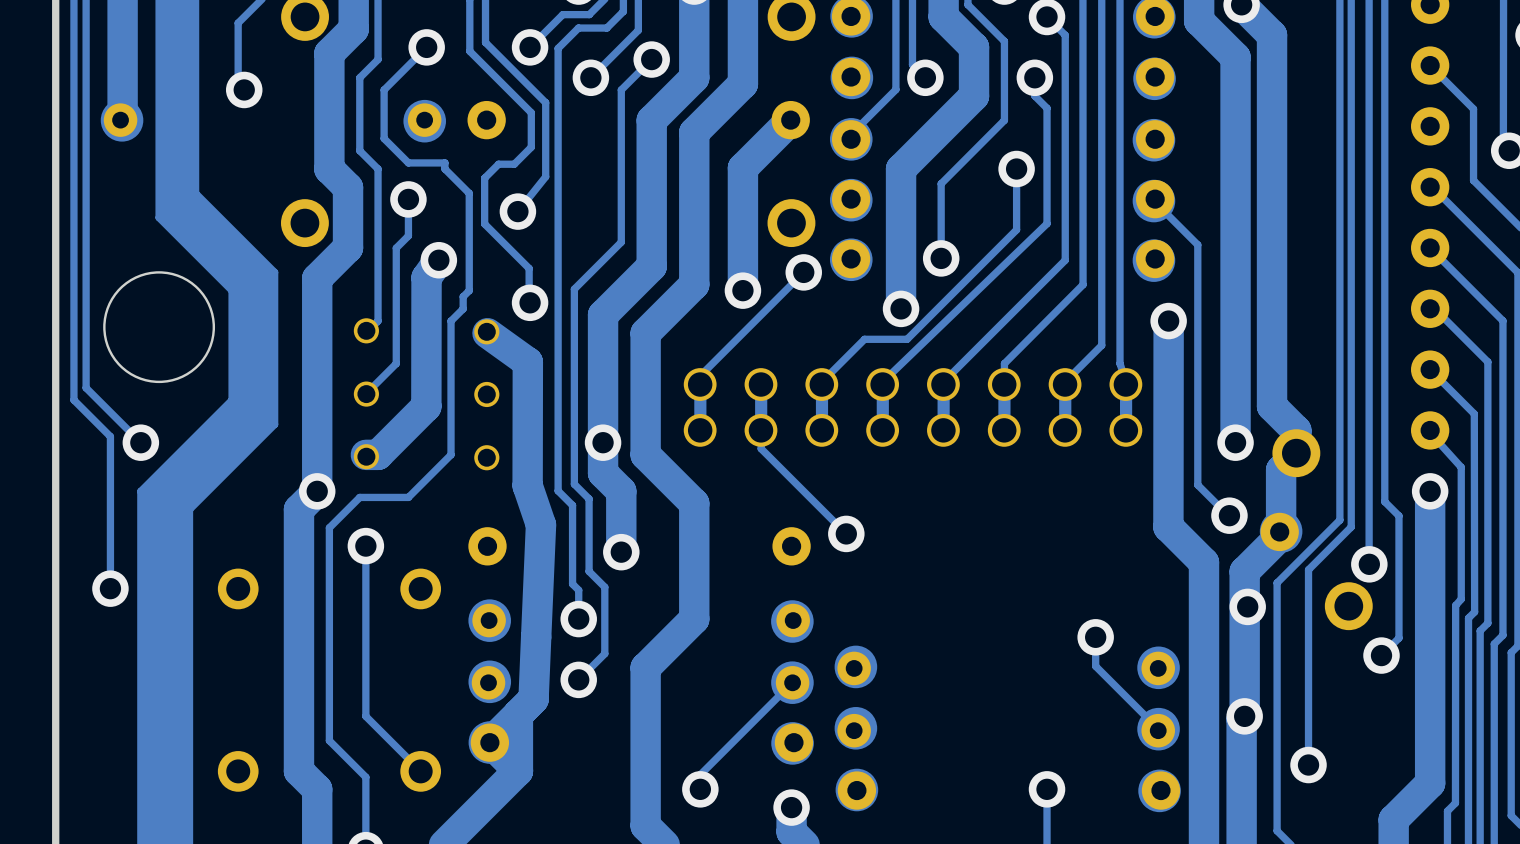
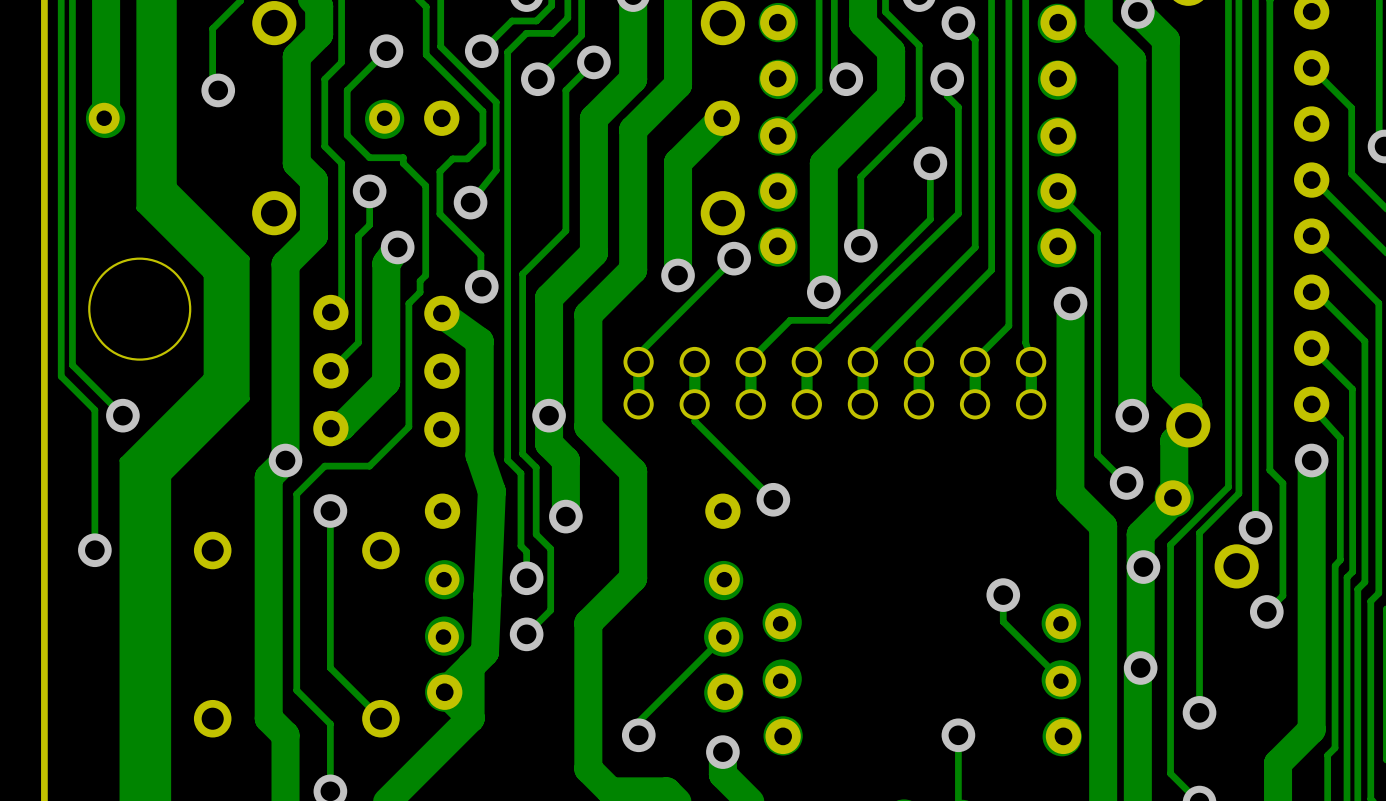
part footprint: [353, 318, 379, 470] -> [313, 294, 349, 447]
part footprint: [474, 319, 500, 471] -> [424, 295, 460, 448]

